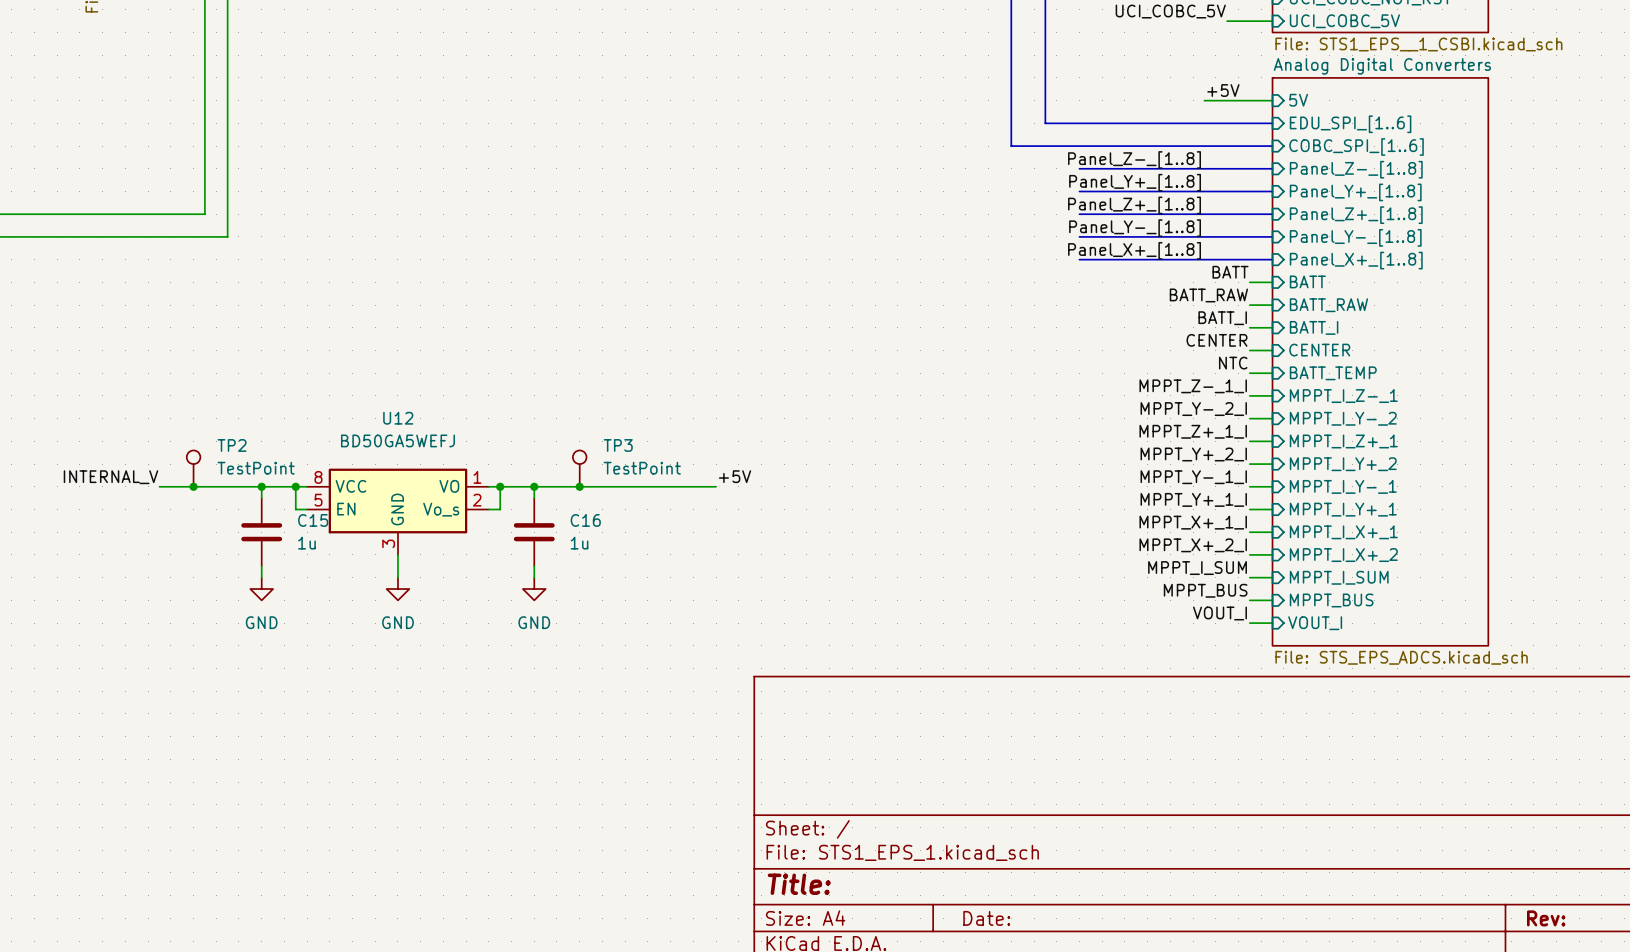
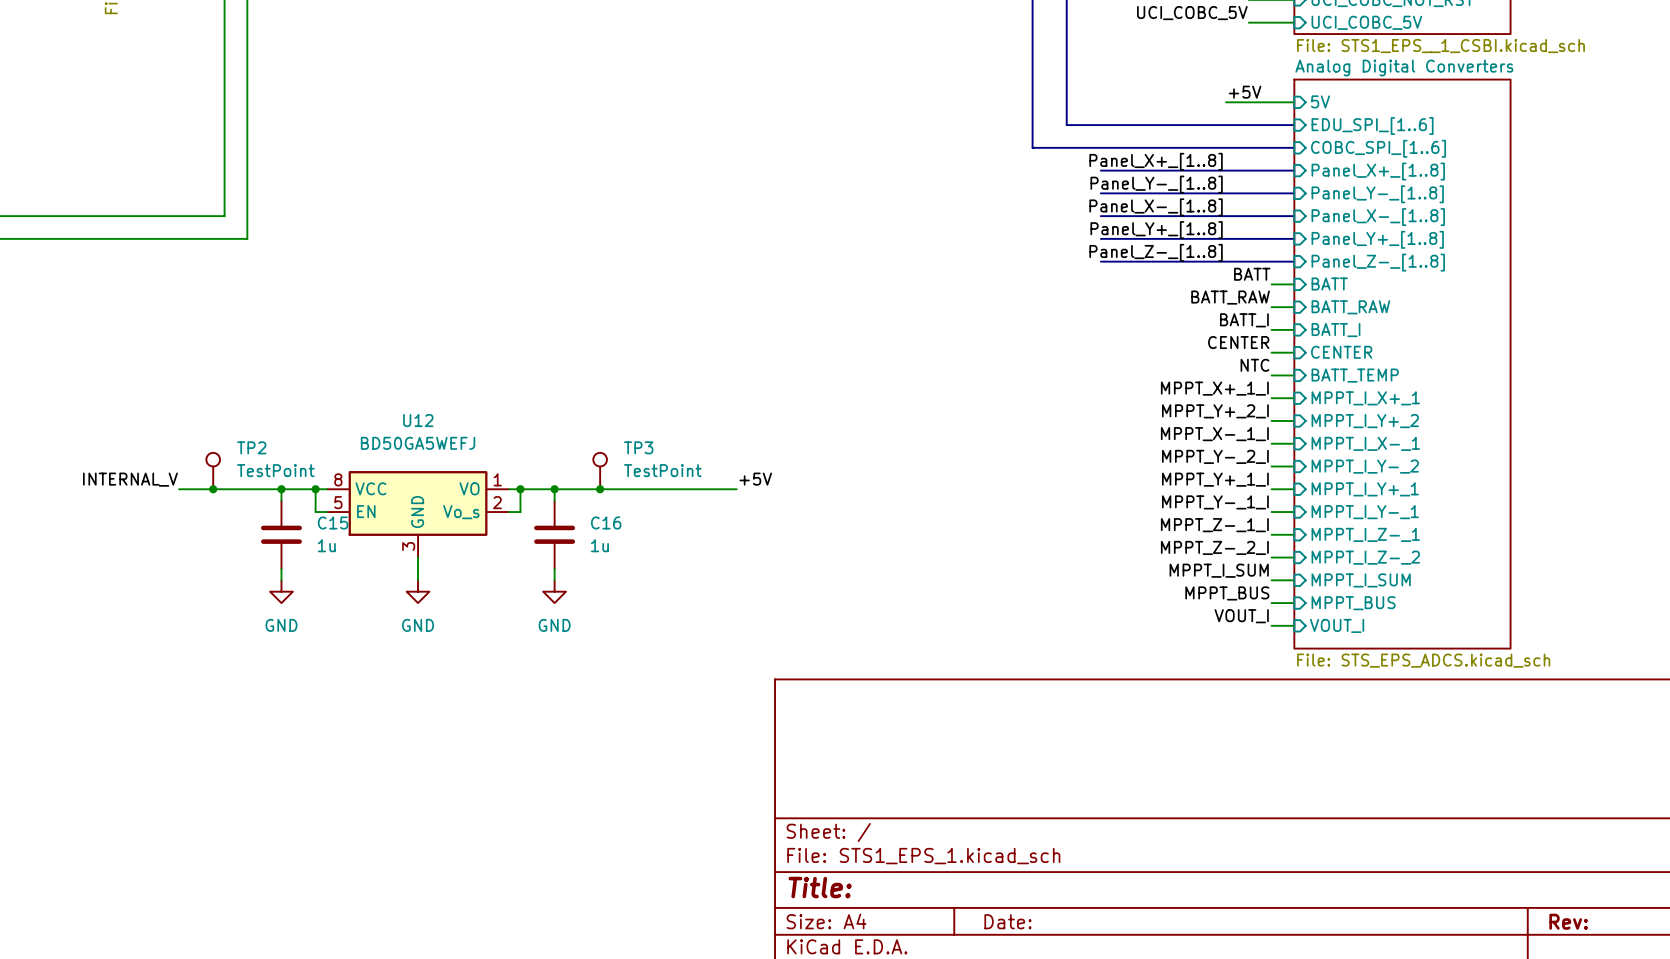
label: Panel_Z-_[1..8] (1134, 160) -> Panel_X+_[1..8] (1156, 161)
sheet pin: Panel_Z-_[1..8] (1356, 169) -> Panel_X+_[1..8] (1378, 171)
label: Panel_Y+_[1..8] (1135, 182) -> Panel_Y-_[1..8] (1156, 184)
sheet pin: Panel_Y+_[1..8] (1355, 192) -> Panel_Y-_[1..8] (1377, 194)
label: Panel_Z+_[1..8] (1134, 205) -> Panel_X-_[1..8] (1156, 207)
sheet pin: Panel_Z+_[1..8] (1356, 215) -> Panel_X-_[1..8] (1378, 217)
label: Panel_Y-_[1..8] (1135, 228) -> Panel_Y+_[1..8] (1156, 230)
sheet pin: Panel_Y-_[1..8] (1355, 237) -> Panel_Y+_[1..8] (1377, 239)
label: Panel_X+_[1..8] (1134, 250) -> Panel_Z-_[1..8] (1156, 252)
sheet pin: Panel_X+_[1..8] (1356, 260) -> Panel_Z-_[1..8] (1378, 262)
label: MPPT_Z-_1_I (1193, 386) -> MPPT_X+_1_I (1214, 388)
sheet pin: MPPT_I_Z-_1 (1343, 396) -> MPPT_I_X+_1 (1365, 398)
label: MPPT_Y-_2_I (1193, 409) -> MPPT_Y+_2_I (1215, 411)
sheet pin: MPPT_I_Y-_2 (1343, 418) -> MPPT_I_Y+_2 (1365, 421)
label: MPPT_Z+_1_I (1193, 431) -> MPPT_X-_1_I (1214, 434)
sheet pin: MPPT_I_Z+_1 (1343, 441) -> MPPT_I_X-_1 (1365, 443)
label: MPPT_Y+_2_I (1193, 454) -> MPPT_Y-_2_I (1215, 456)
sheet pin: MPPT_I_Y+_2 (1343, 464) -> MPPT_I_Y-_2 (1365, 466)
label: MPPT_Y-_1_I (1193, 477) -> MPPT_Y+_1_I (1215, 479)
sheet pin: MPPT_I_Y-_1 (1343, 486) -> MPPT_I_Y+_1 (1365, 489)
label: MPPT_Y+_1_I (1193, 499) -> MPPT_Y-_1_I (1215, 502)
sheet pin: MPPT_I_Y+_1 (1343, 509) -> MPPT_I_Y-_1 (1365, 512)
label: MPPT_X+_1_I (1193, 522) -> MPPT_Z-_1_I (1214, 525)
sheet pin: MPPT_I_X+_1 (1343, 532) -> MPPT_I_Z-_1 (1365, 534)
label: MPPT_X+_2_I (1193, 545) -> MPPT_Z-_2_I (1214, 547)
sheet pin: MPPT_I_X+_2 (1343, 555) -> MPPT_I_Z-_2 (1365, 557)

